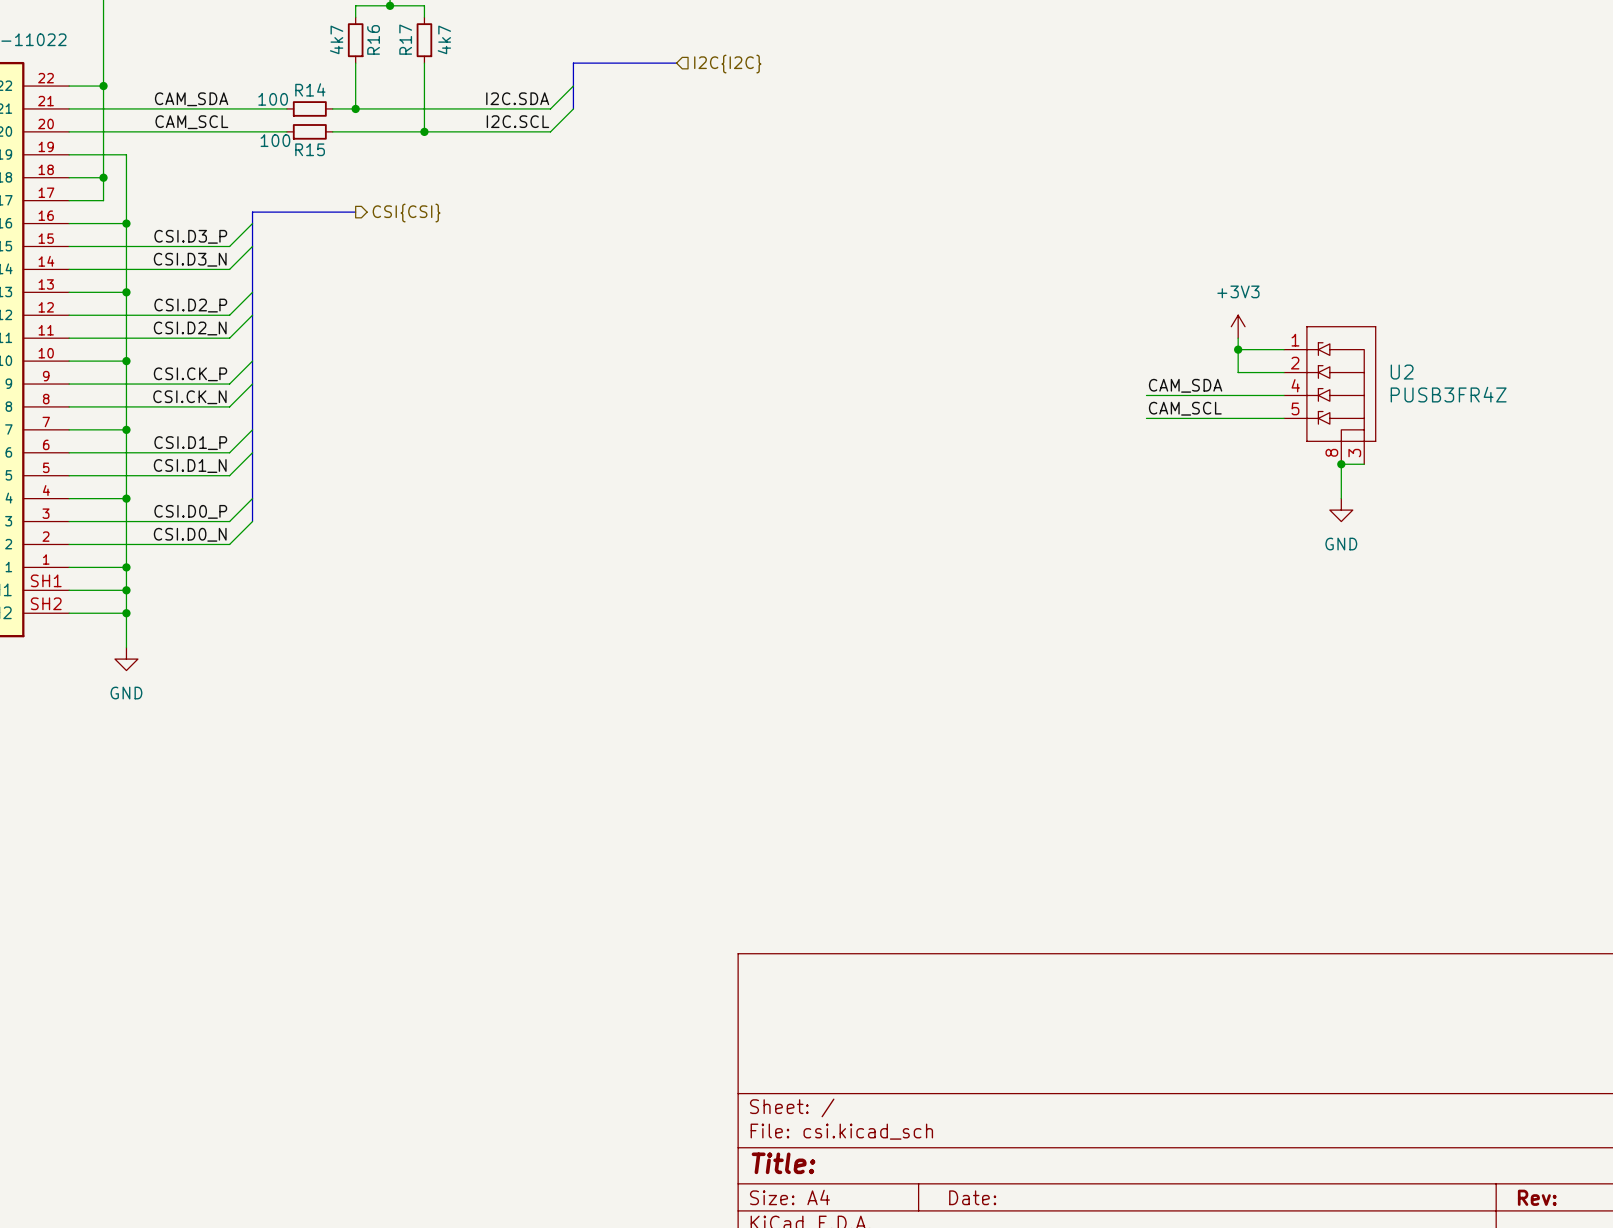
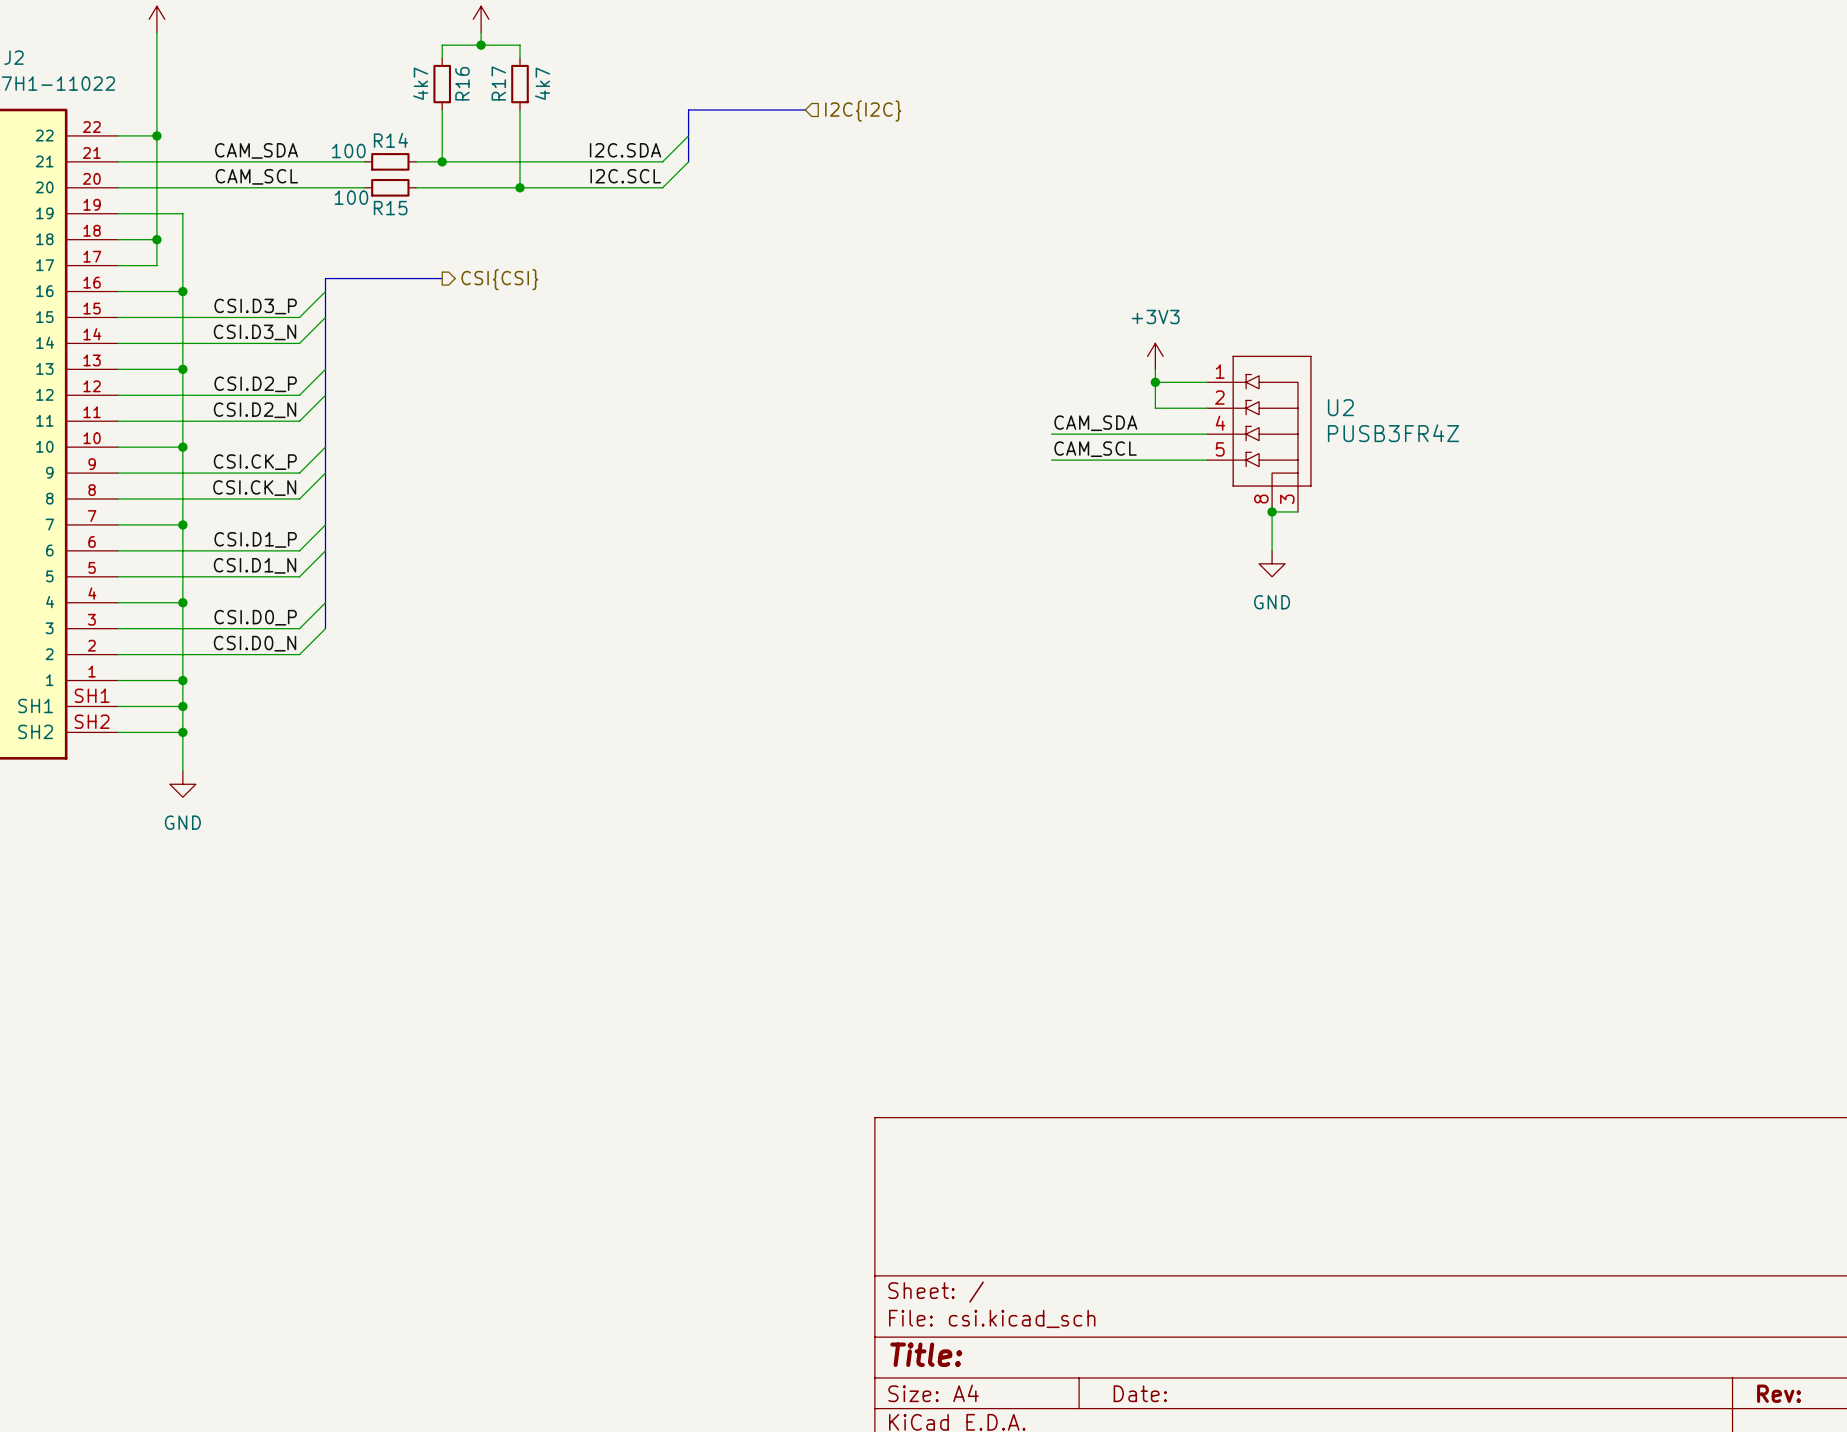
power symbol: none -> +3V3 (1155, 356)
wire: none -> (1155, 369) (1155, 408) (1207, 408)
wire: none -> (1155, 382) (1207, 382)
junction: none -> (1155, 382)
power symbol: +3V3 (1238, 326) -> none
wire: (1238, 338) (1238, 372) (1284, 372) -> none
label: none -> CAM_SDA (1095, 423)
wire: none -> (1051, 434) (1207, 434)
wire: (1238, 349) (1284, 349) -> none
junction: (1238, 349) -> none
label: none -> CAM_SCL (1095, 449)
wire: none -> (1051, 460) (1207, 460)
label: CAM_SDA (1185, 385) -> none
wire: (1146, 395) (1284, 395) -> none
U2 position: (1330, 395) -> (1259, 433)
label: CAM_SCL (1185, 408) -> none
junction: none -> (1272, 511)
wire: none -> (1297, 511) (1272, 511) (1272, 550)
wire: (1146, 418) (1284, 418) -> none
power symbol: none -> GND (1272, 563)
junction: (1341, 464) -> none
wire: (1364, 464) (1341, 464) (1341, 498) -> none
power symbol: GND (1341, 510) -> none

